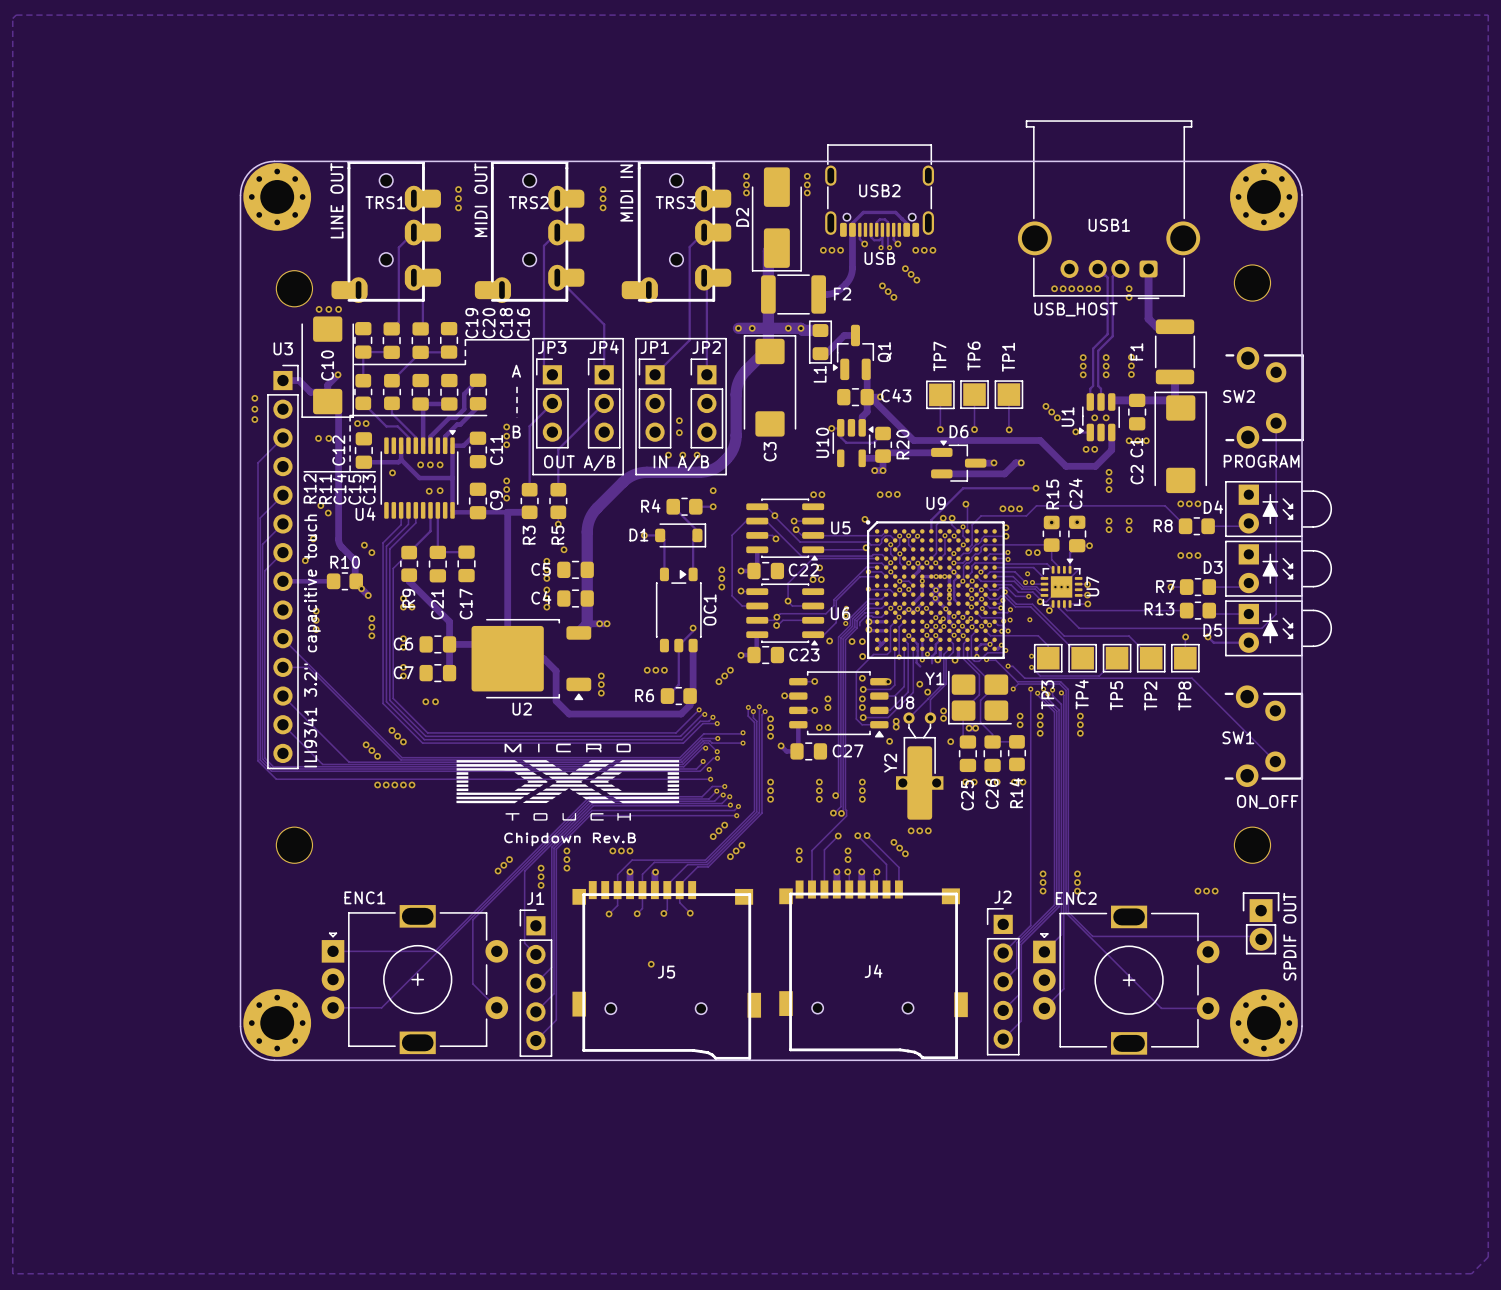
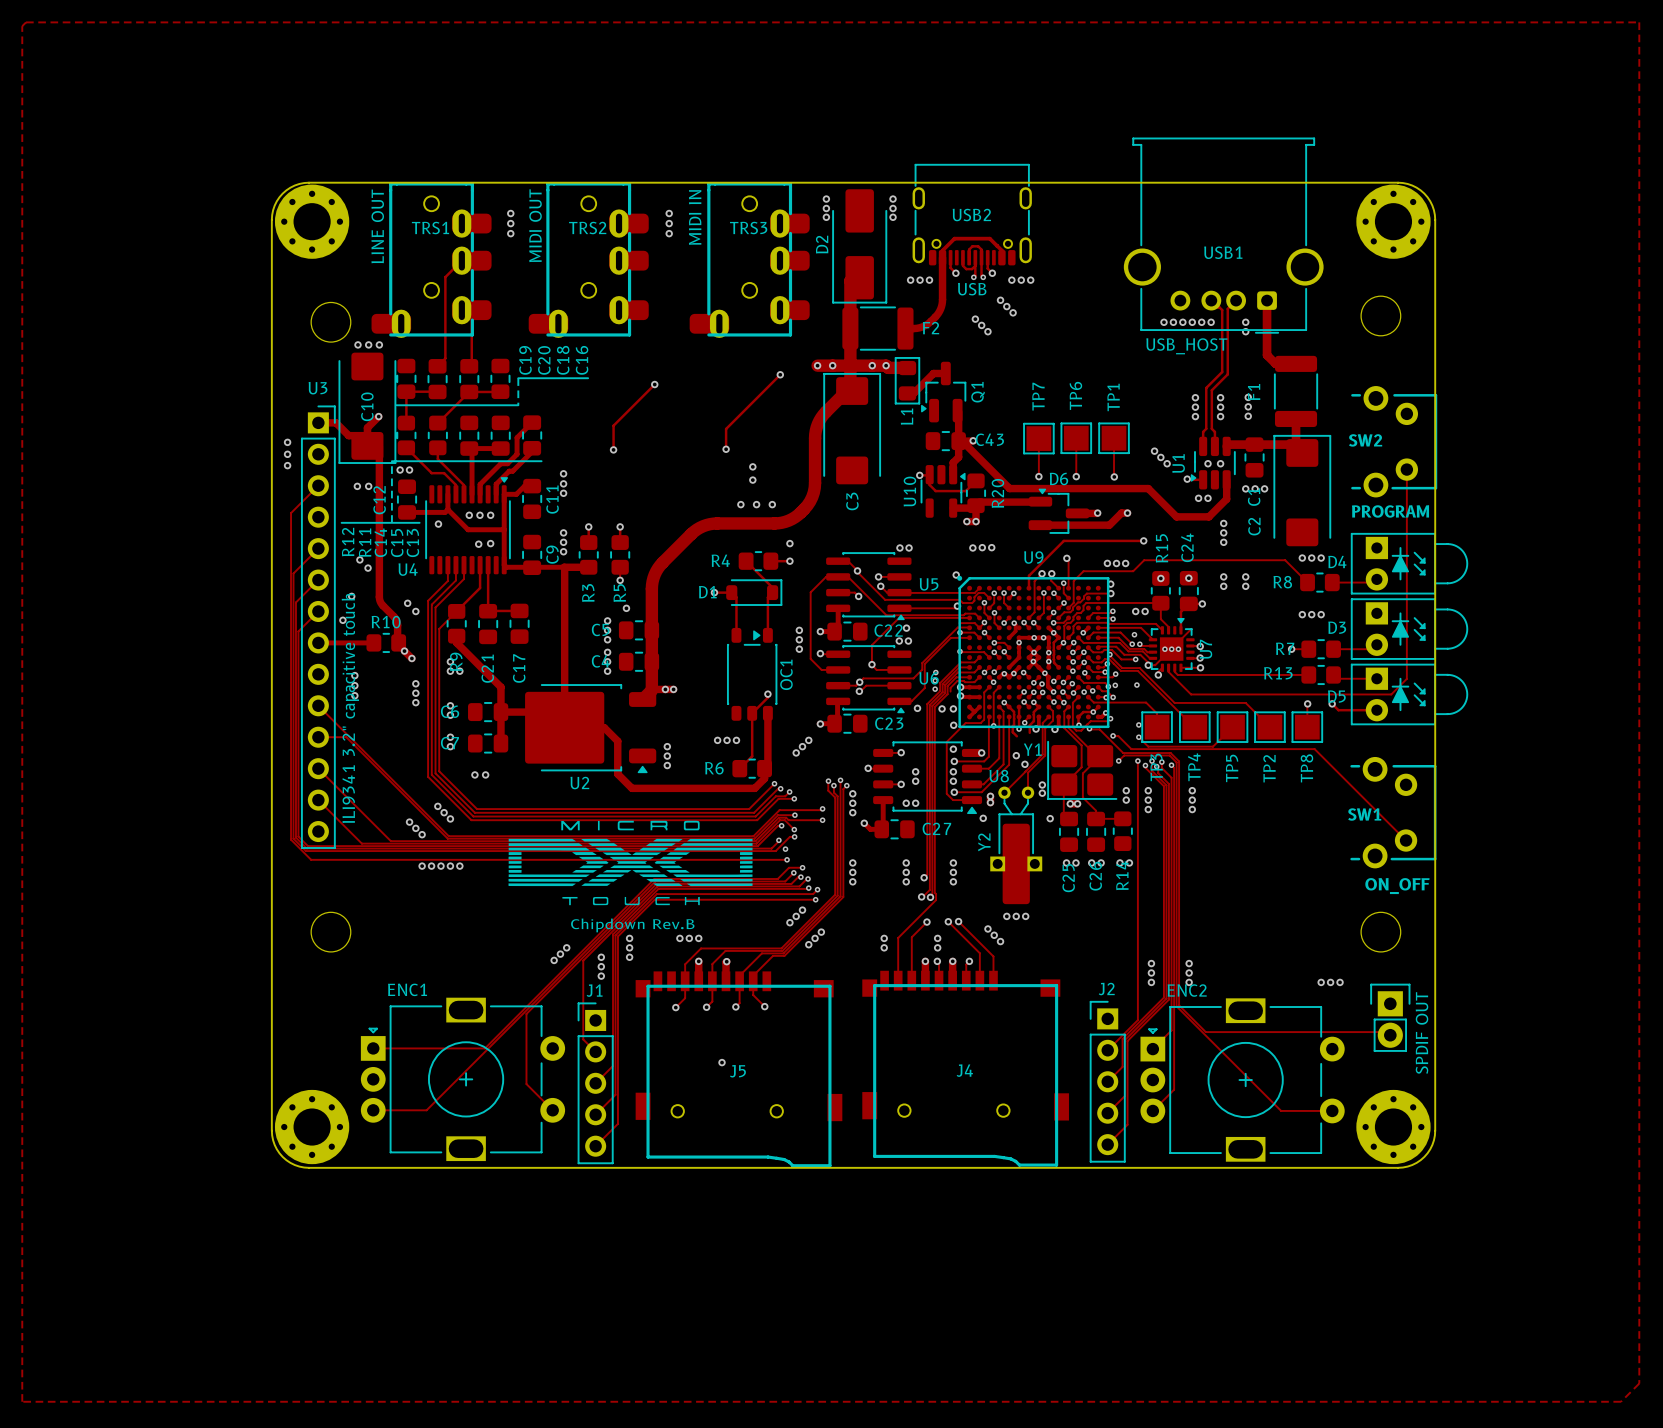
track: (557, 232) (543, 245) (543, 366) (552, 374) -> none
track: (704, 232) (689, 246) (689, 340) (655, 374) -> none
track: (557, 277) (604, 324) (604, 374) -> none
track: (704, 277) (706, 280) (706, 374) -> none
track: none -> (780, 374) (726, 428) (726, 449)
via: none -> (780, 374)
line: (533, 338) (623, 338) (623, 474) (533, 474) (533, 338) -> none
line: (636, 338) (726, 338) (726, 474) (636, 474) (636, 338) -> none
track: none -> (654, 384) (613, 425) (613, 449)
via: none -> (654, 384)
text: A (516, 371) -> none
line: (517, 386) (517, 417) -> none
track: (552, 403) (529, 426) (529, 475) -> none
JP3: (552, 403) -> none
track: (604, 403) (558, 449) (558, 475) -> none
JP4: (604, 403) -> none
JP1: (655, 403) -> none
JP2: (706, 403) -> none
via: none -> (726, 449)
via: none -> (613, 449)
text: B (516, 432) -> none
text: OUT A/B (579, 462) -> none
text: IN A/B (681, 462) -> none
via: none -> (588, 526)
via: none -> (620, 526)

